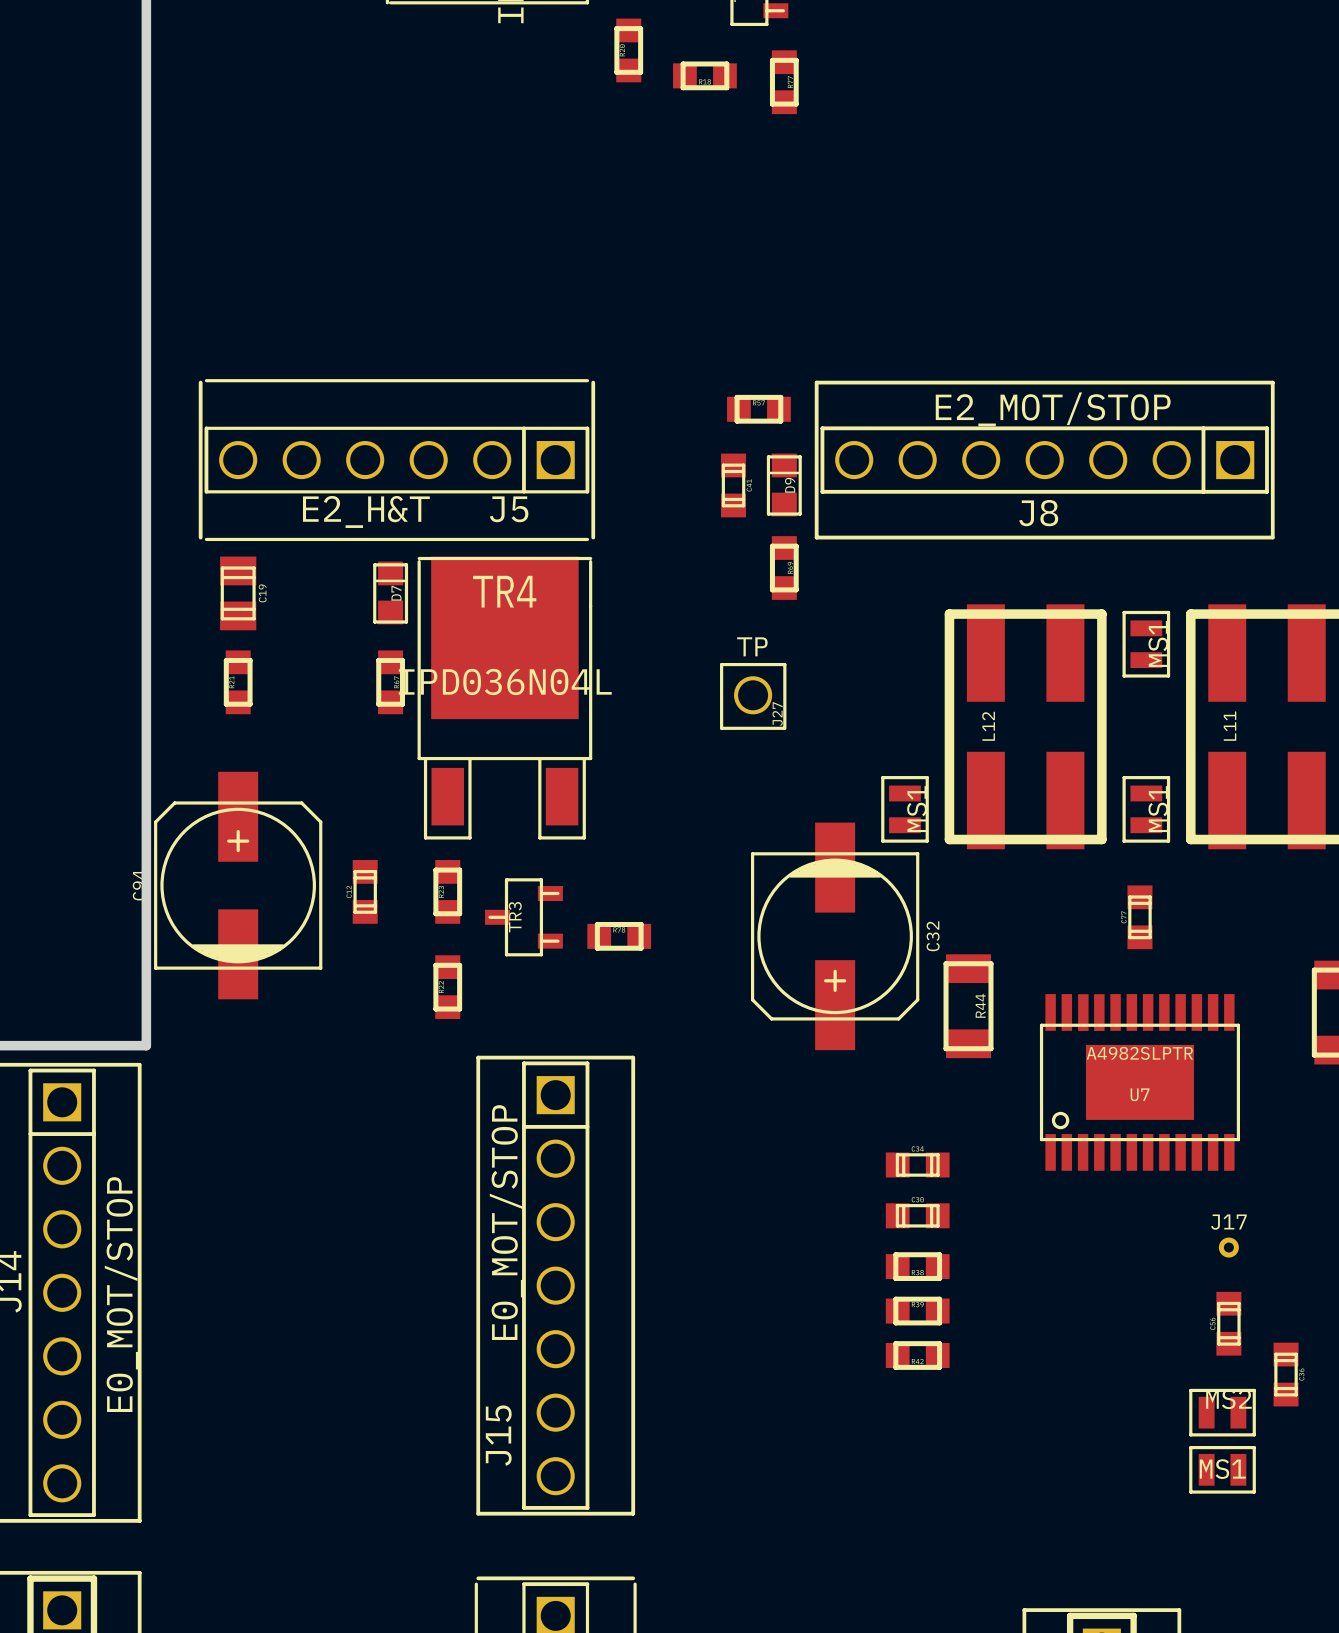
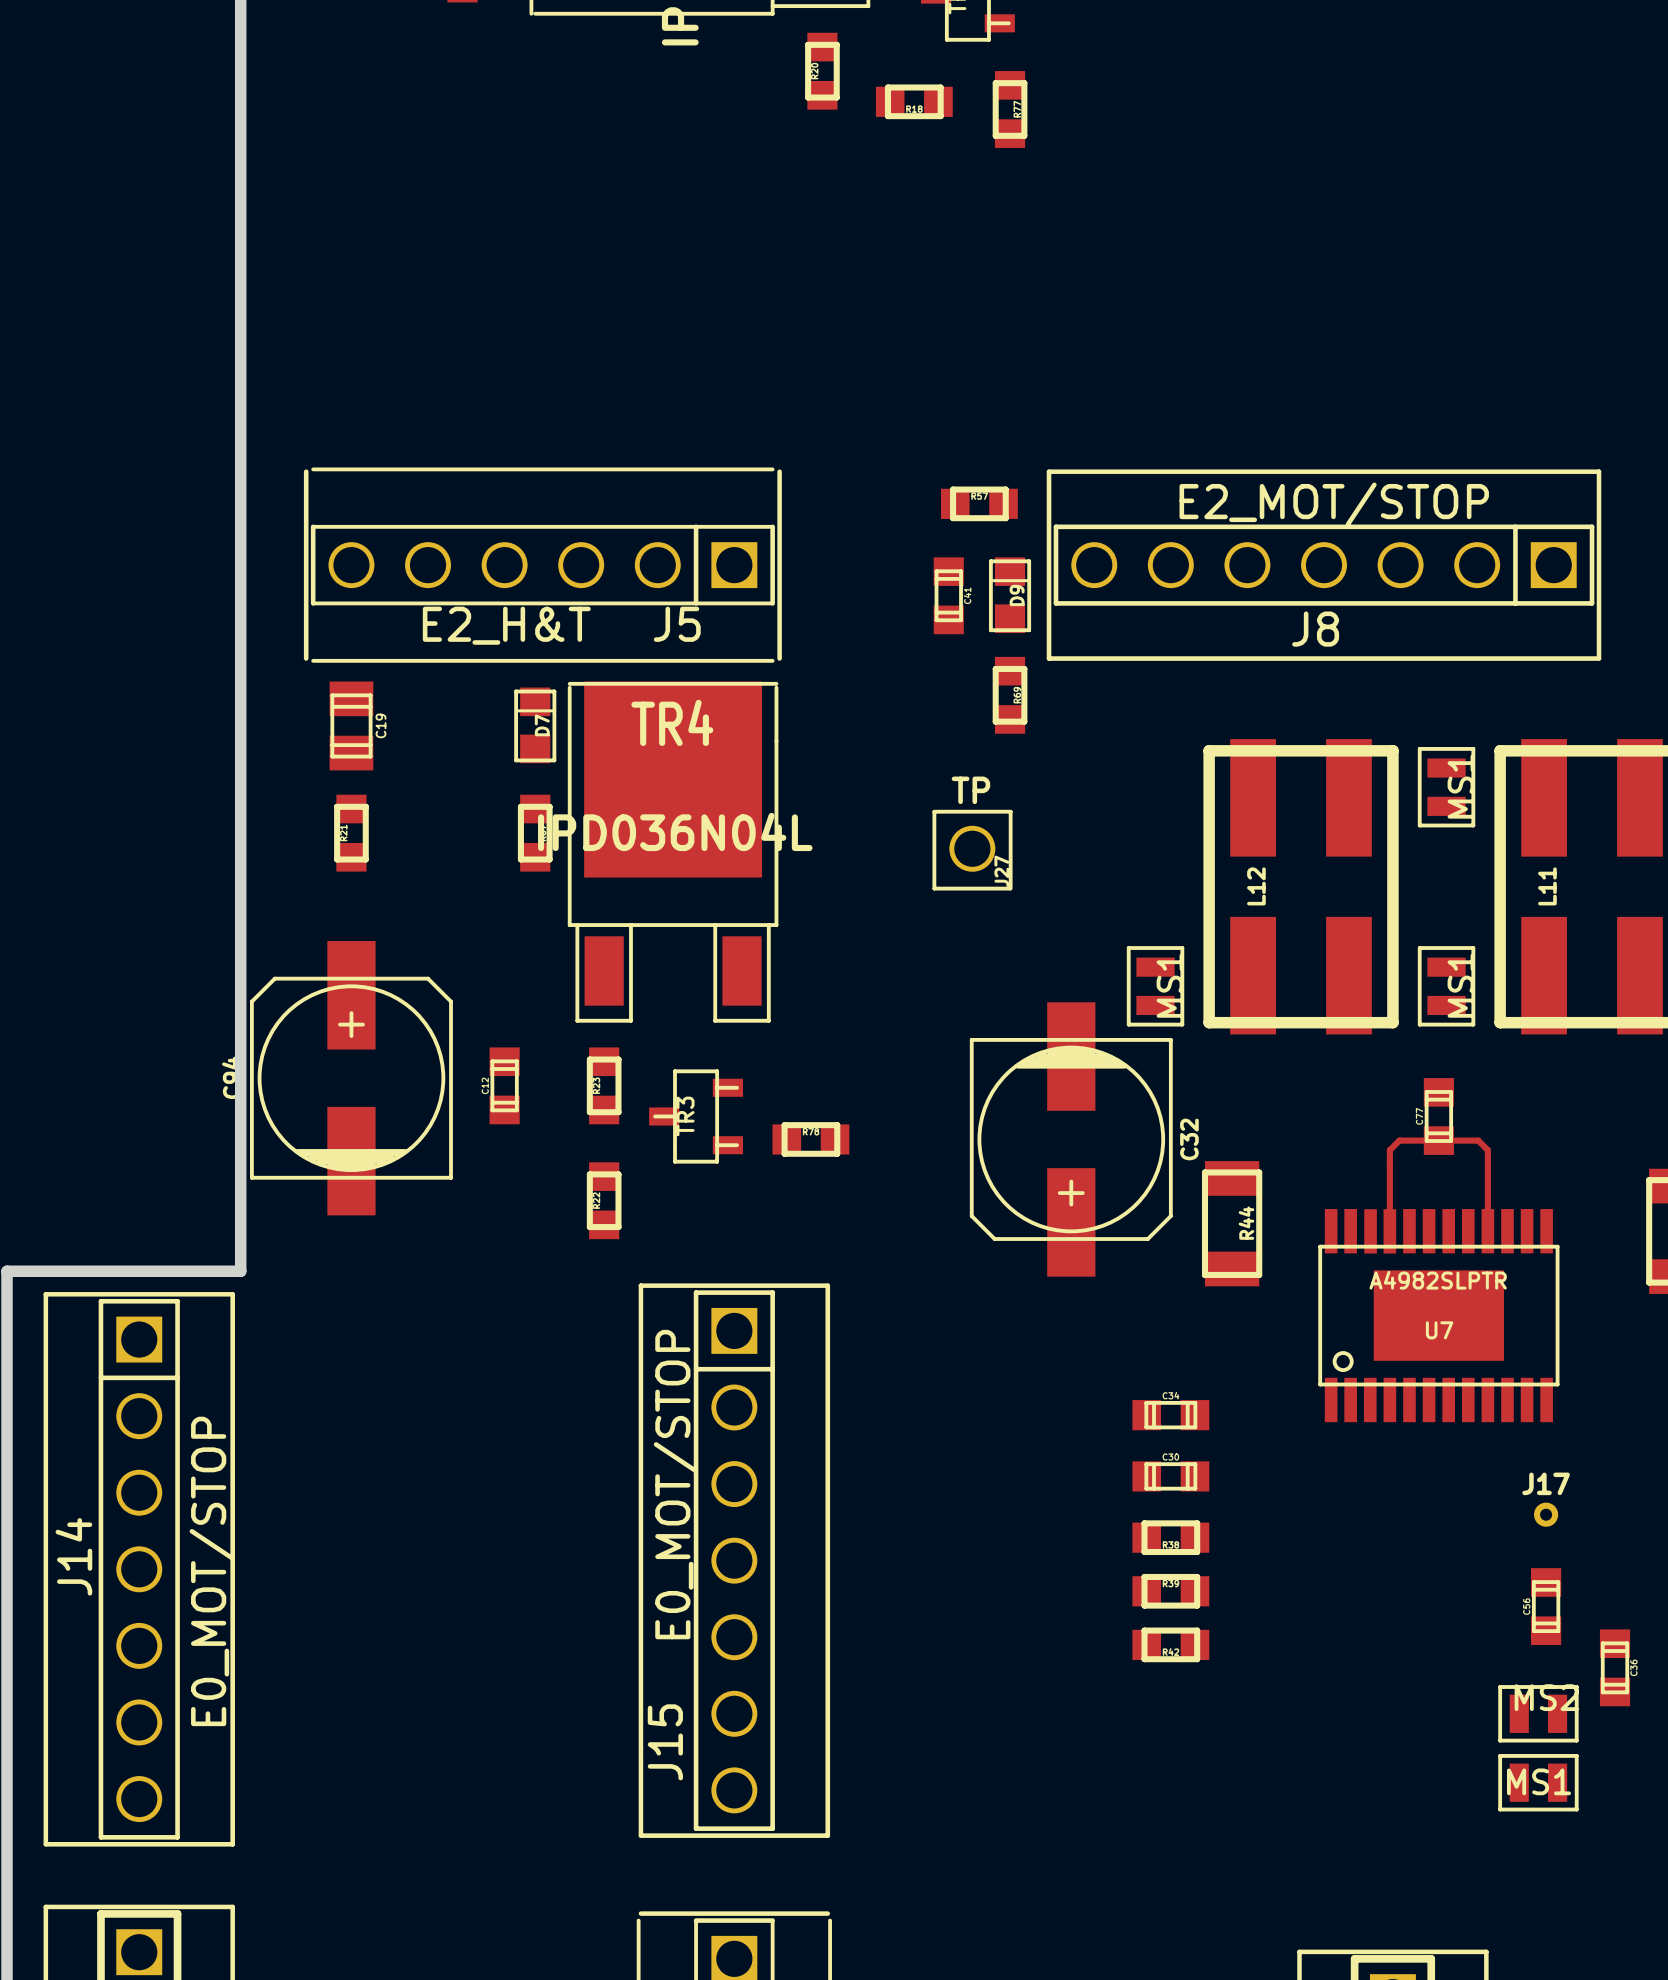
track: none -> (1487, 1231) (1487, 1150) (1478, 1140) (1399, 1140) (1389, 1150) (1389, 1231)

